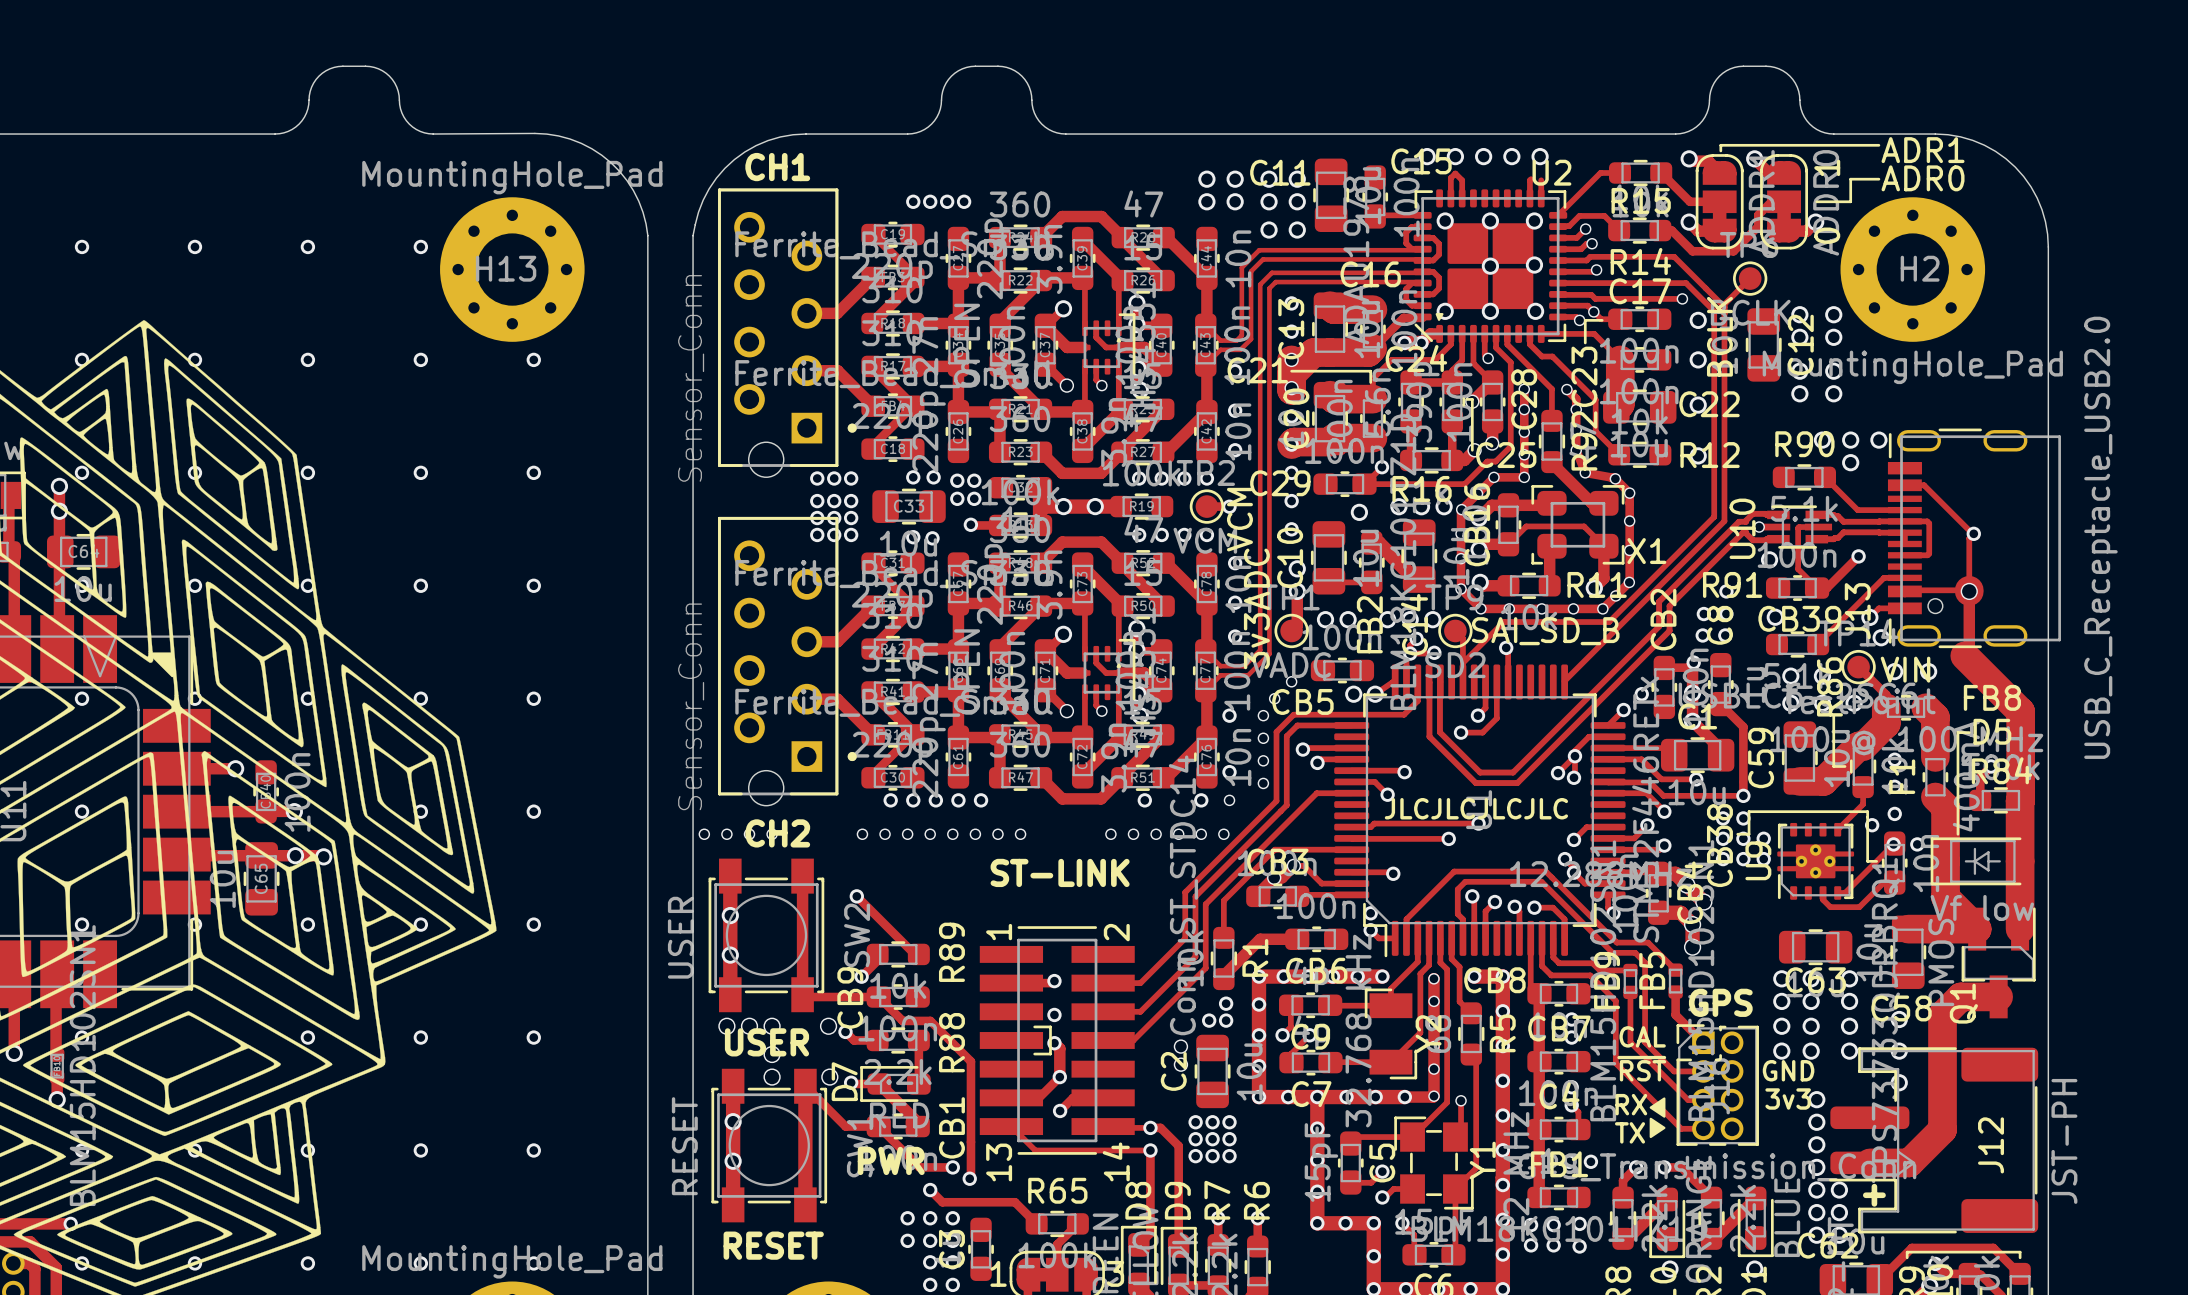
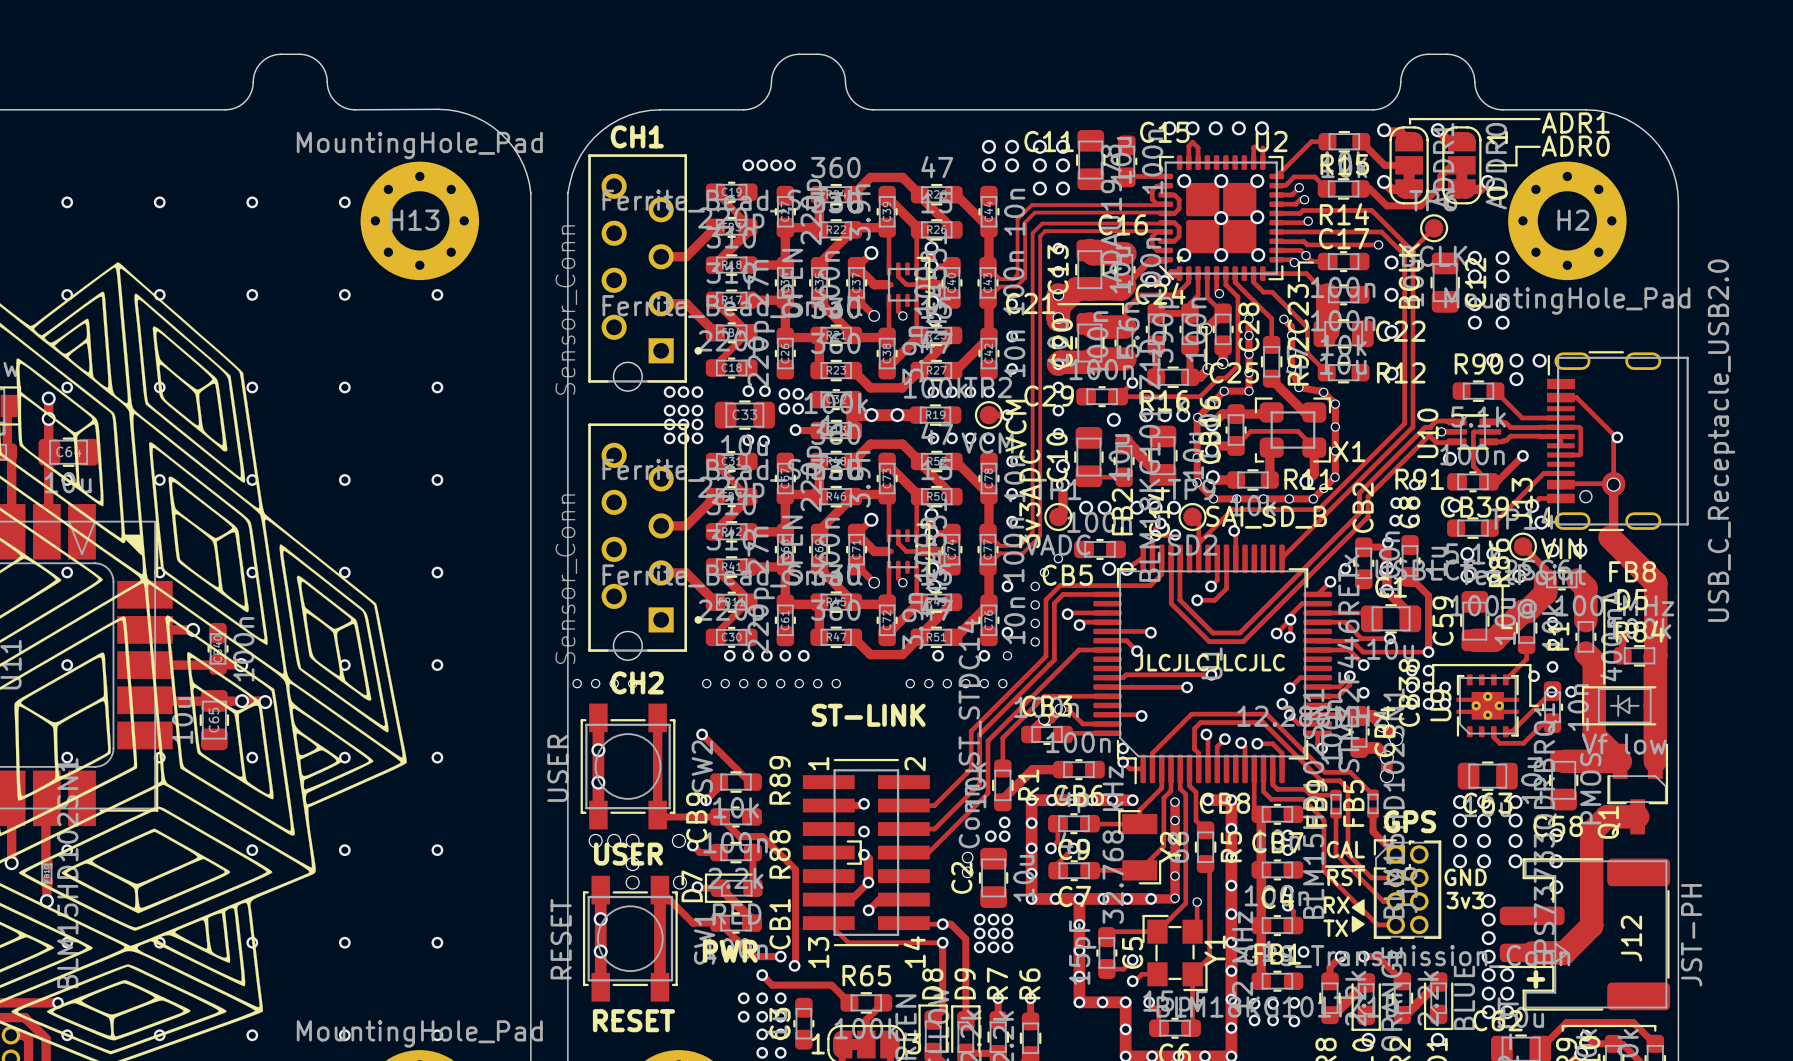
track: (1664, 845) (1660, 849) (1633, 849) -> (1349, 676) (1349, 684) (1338, 696)

